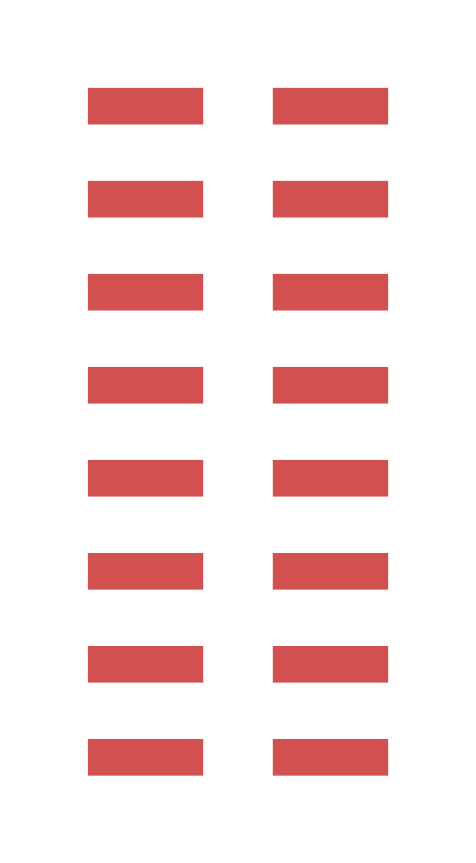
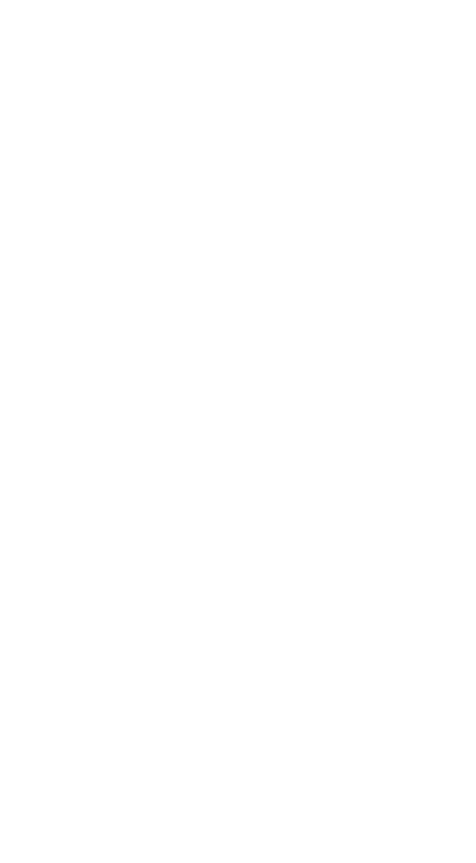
part: (238, 431) -> none

